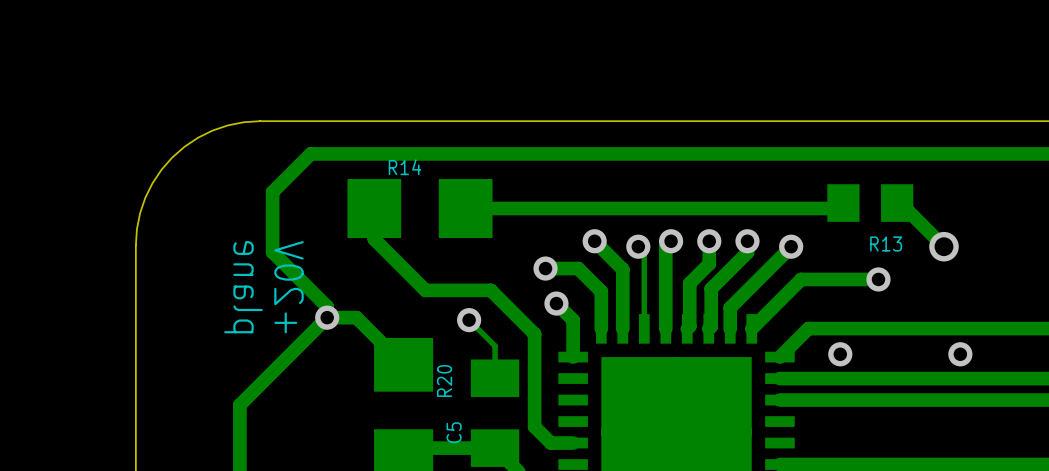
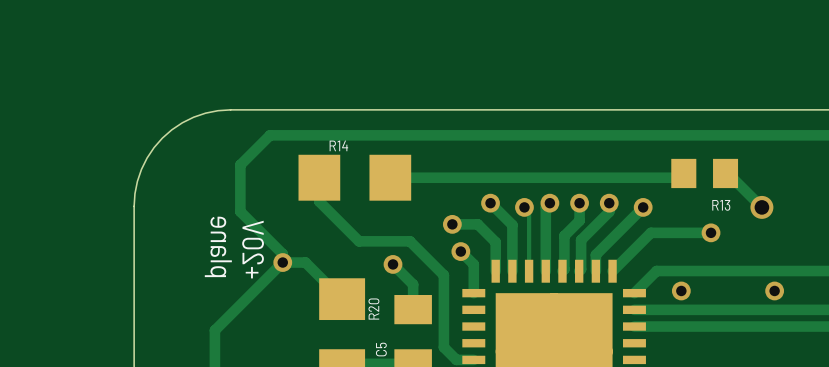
track width: thin (469, 320) (495, 346) (495, 378) -> thick (393, 264) (413, 284) (413, 309)

